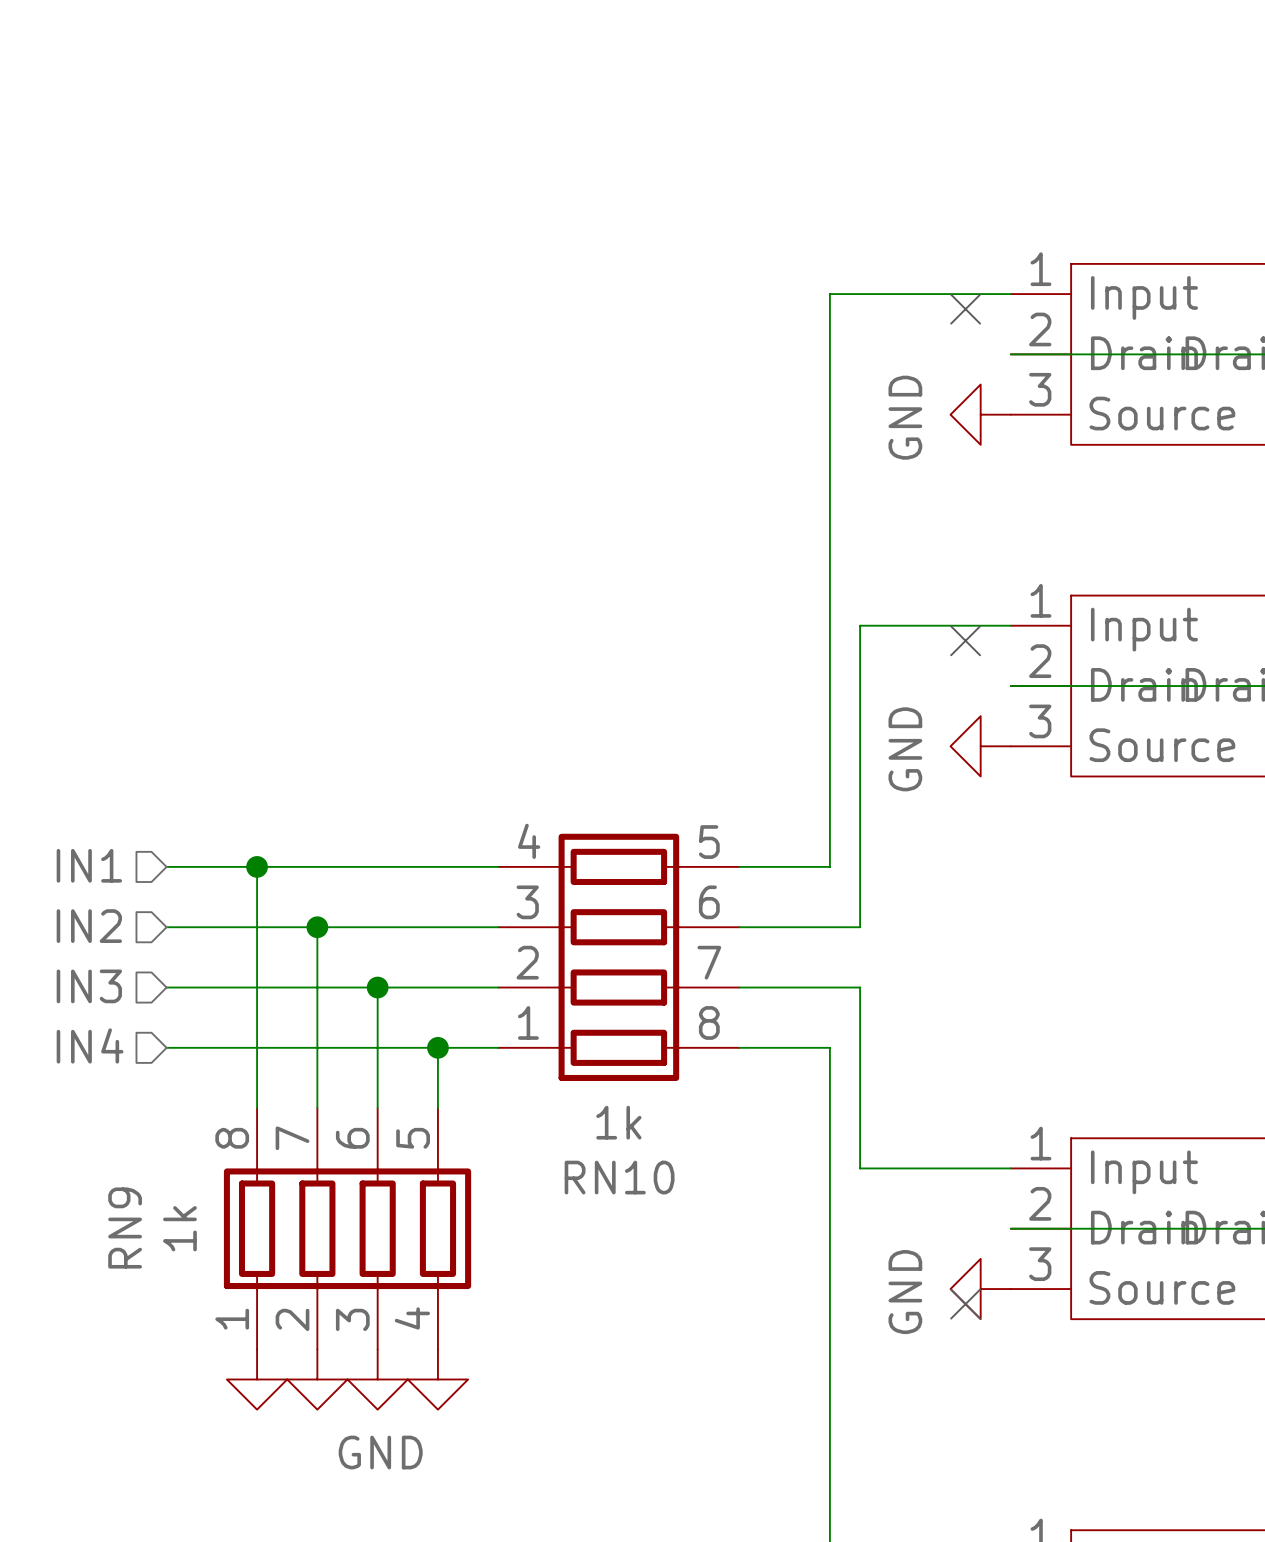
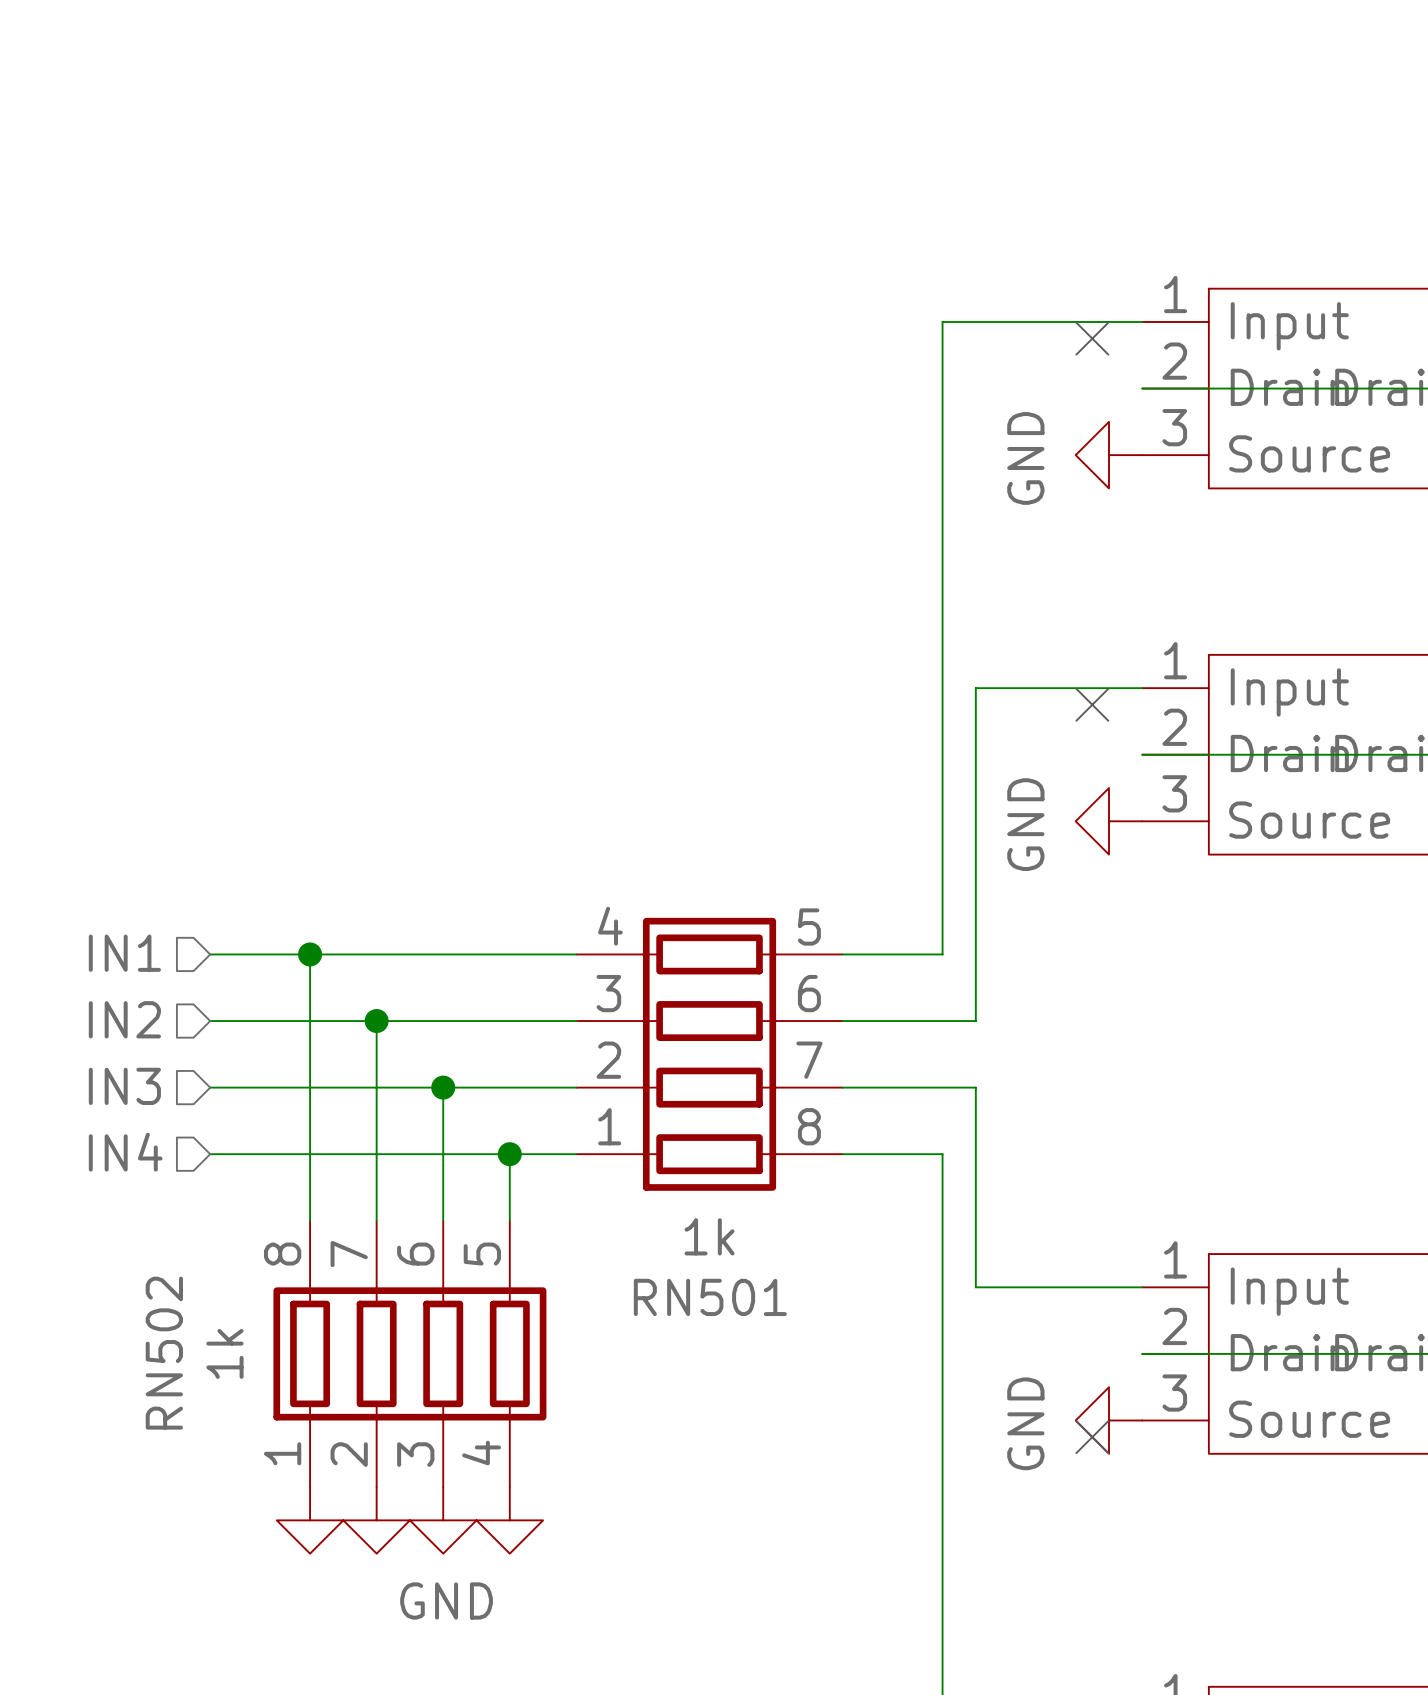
RN10 name: RN10 (619, 1177) -> RN501 (710, 1297)
RN9 name: RN9 (125, 1228) -> RN502 (164, 1353)

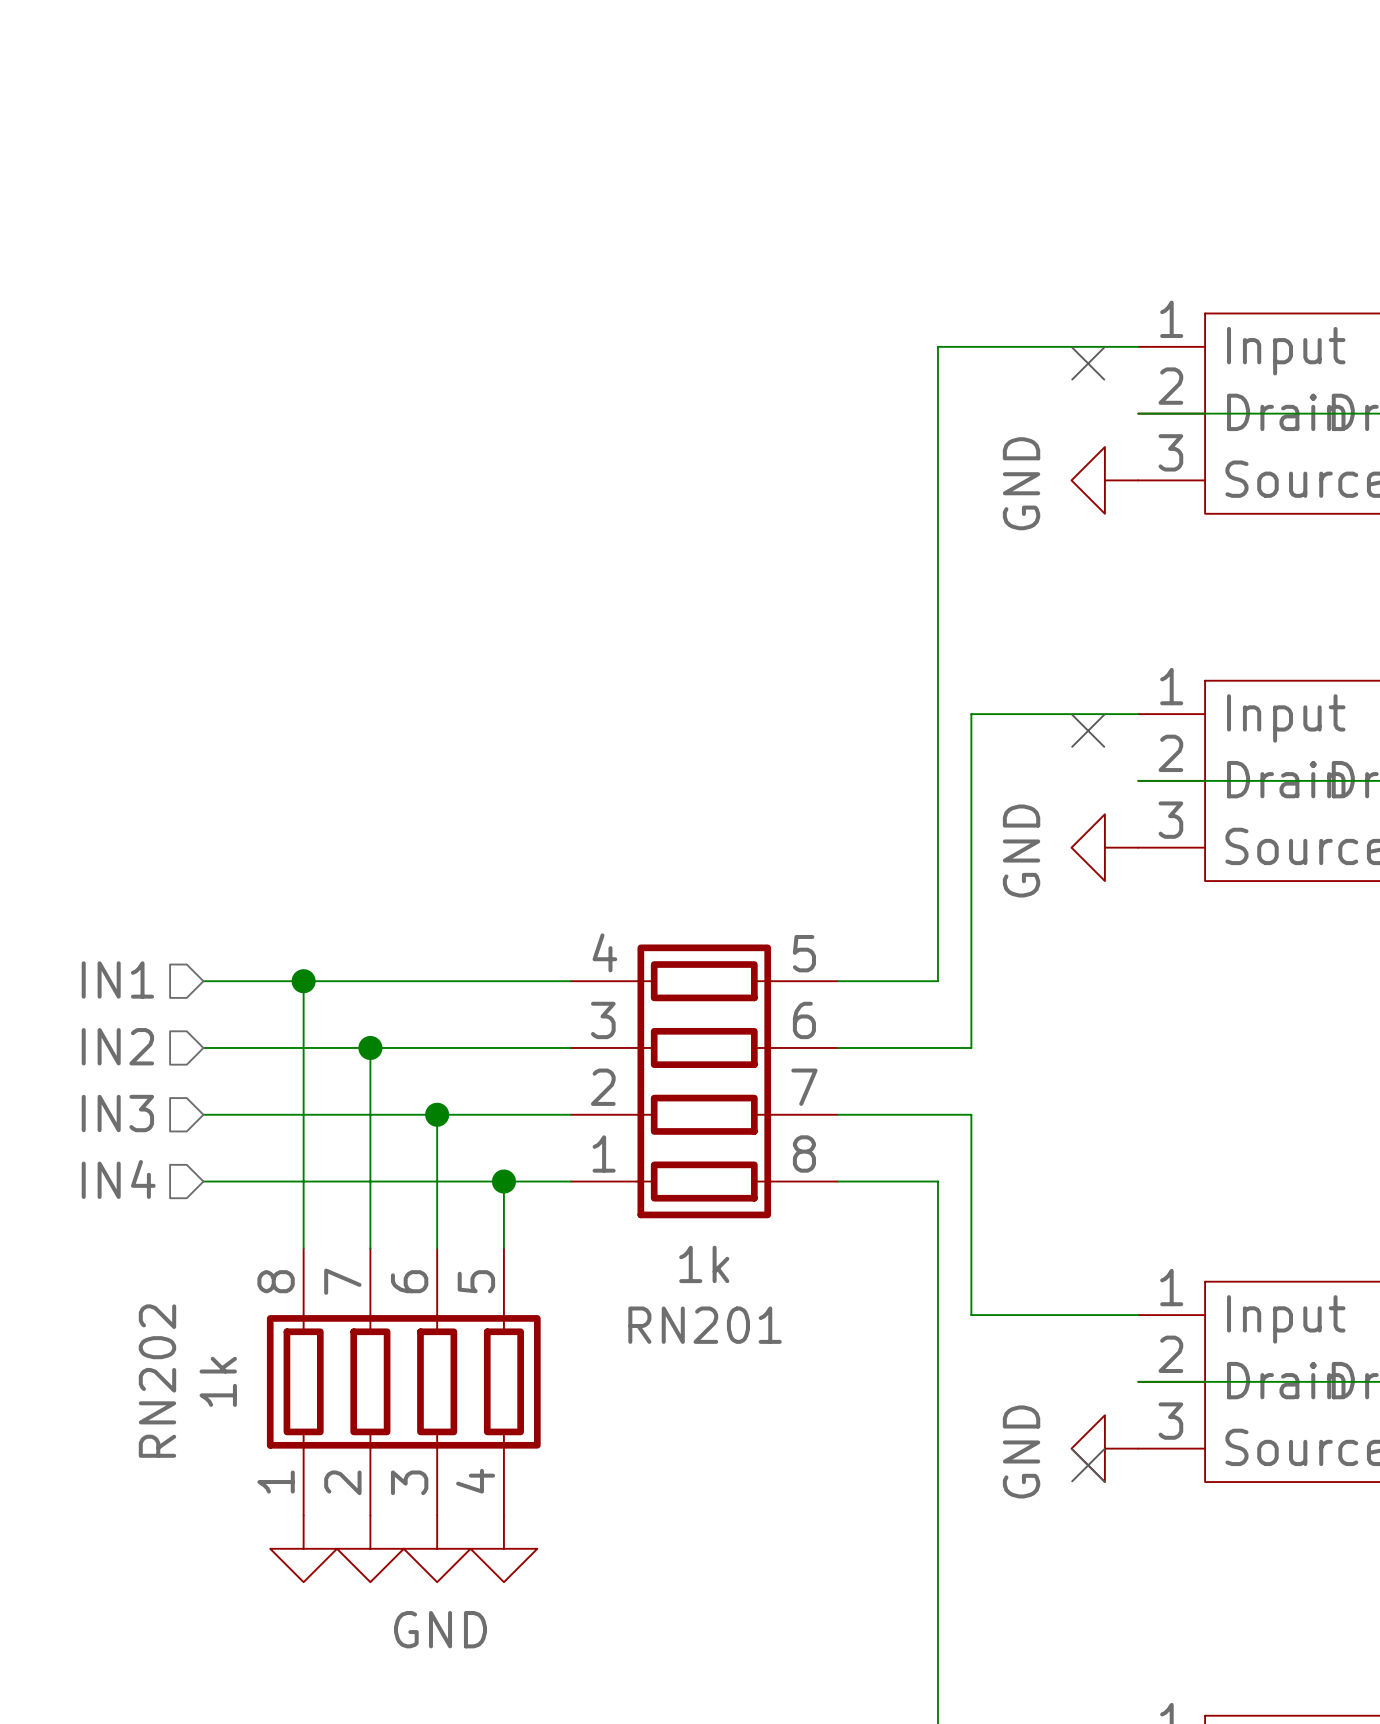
RN501 name: RN501 (710, 1297) -> RN201 (705, 1325)
RN502 name: RN502 (164, 1353) -> RN202 (157, 1381)

